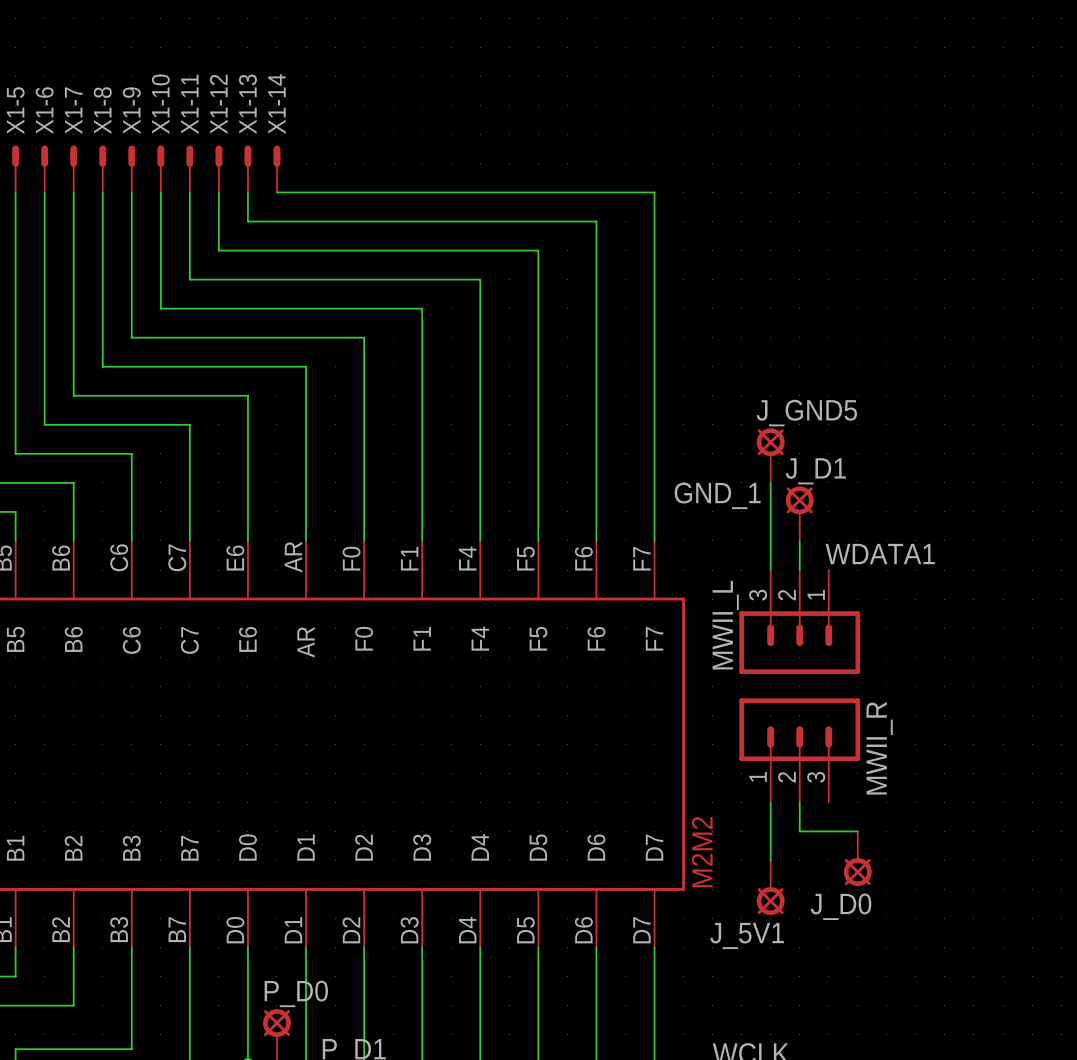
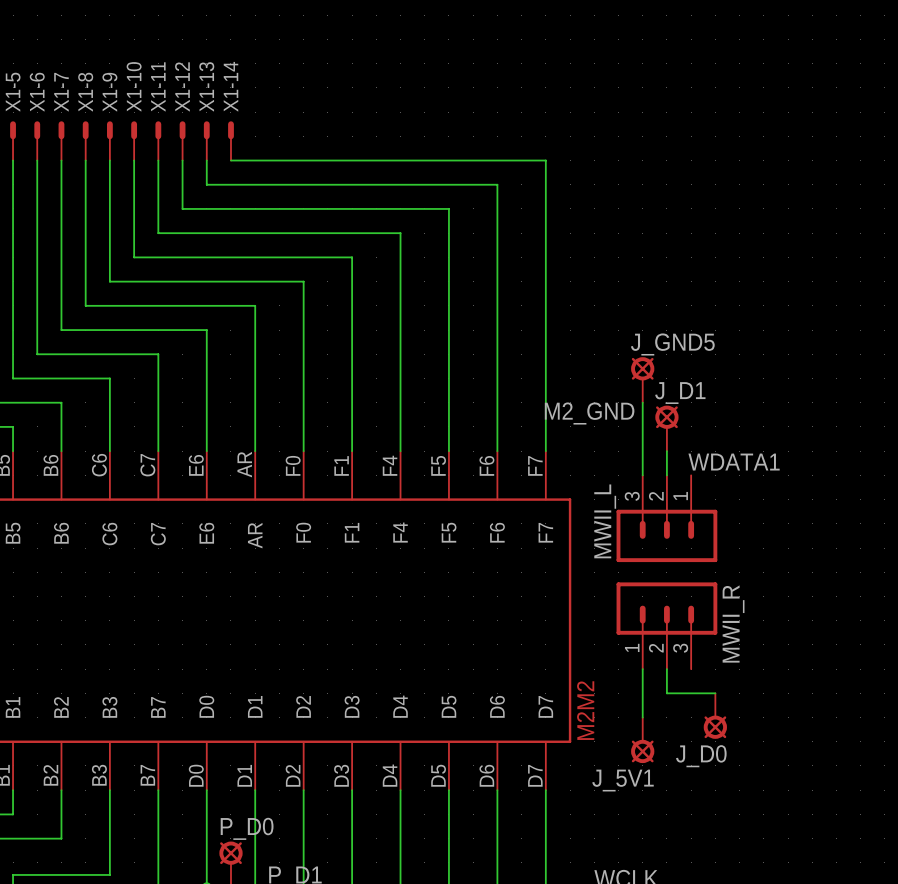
label: GND_1 (717, 495) -> M2_GND (589, 413)

